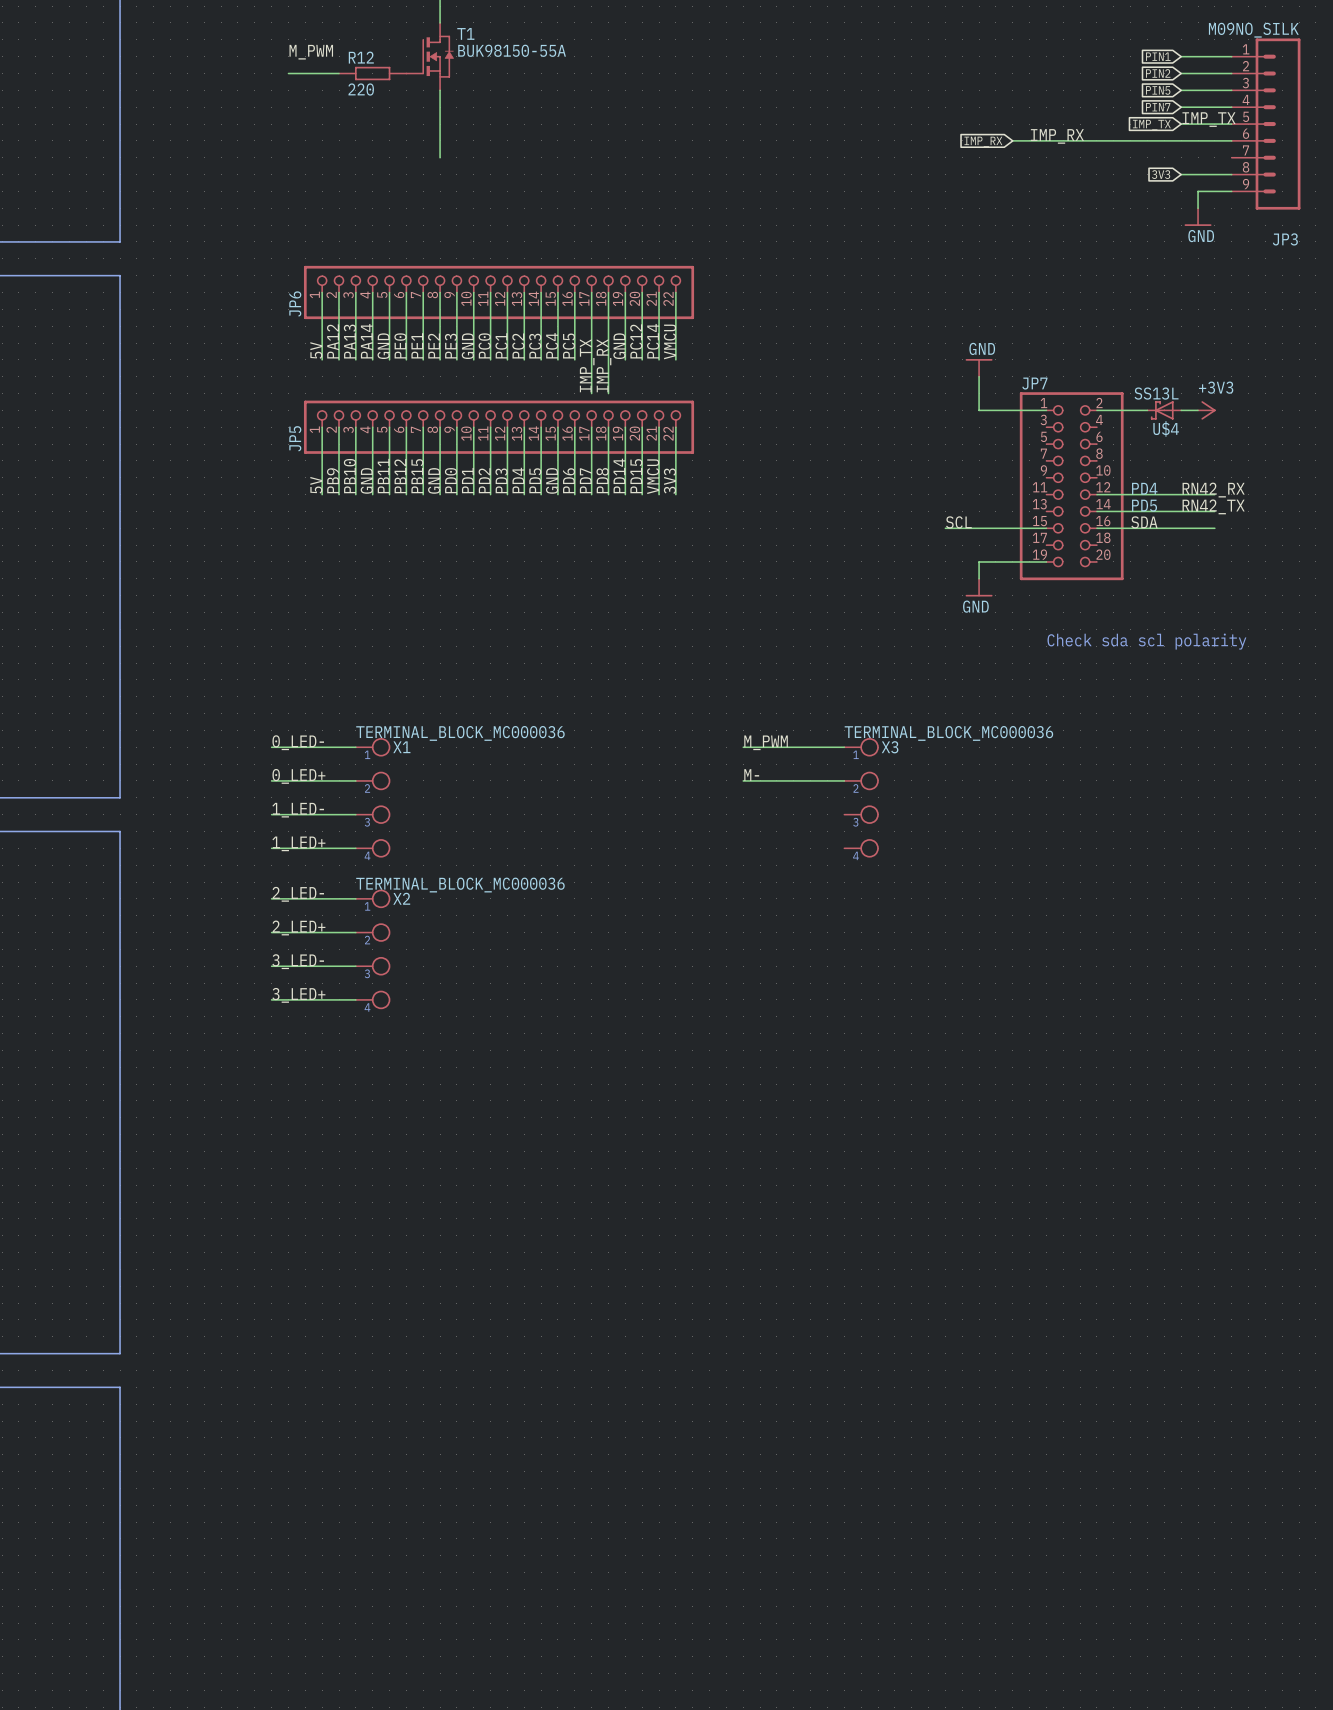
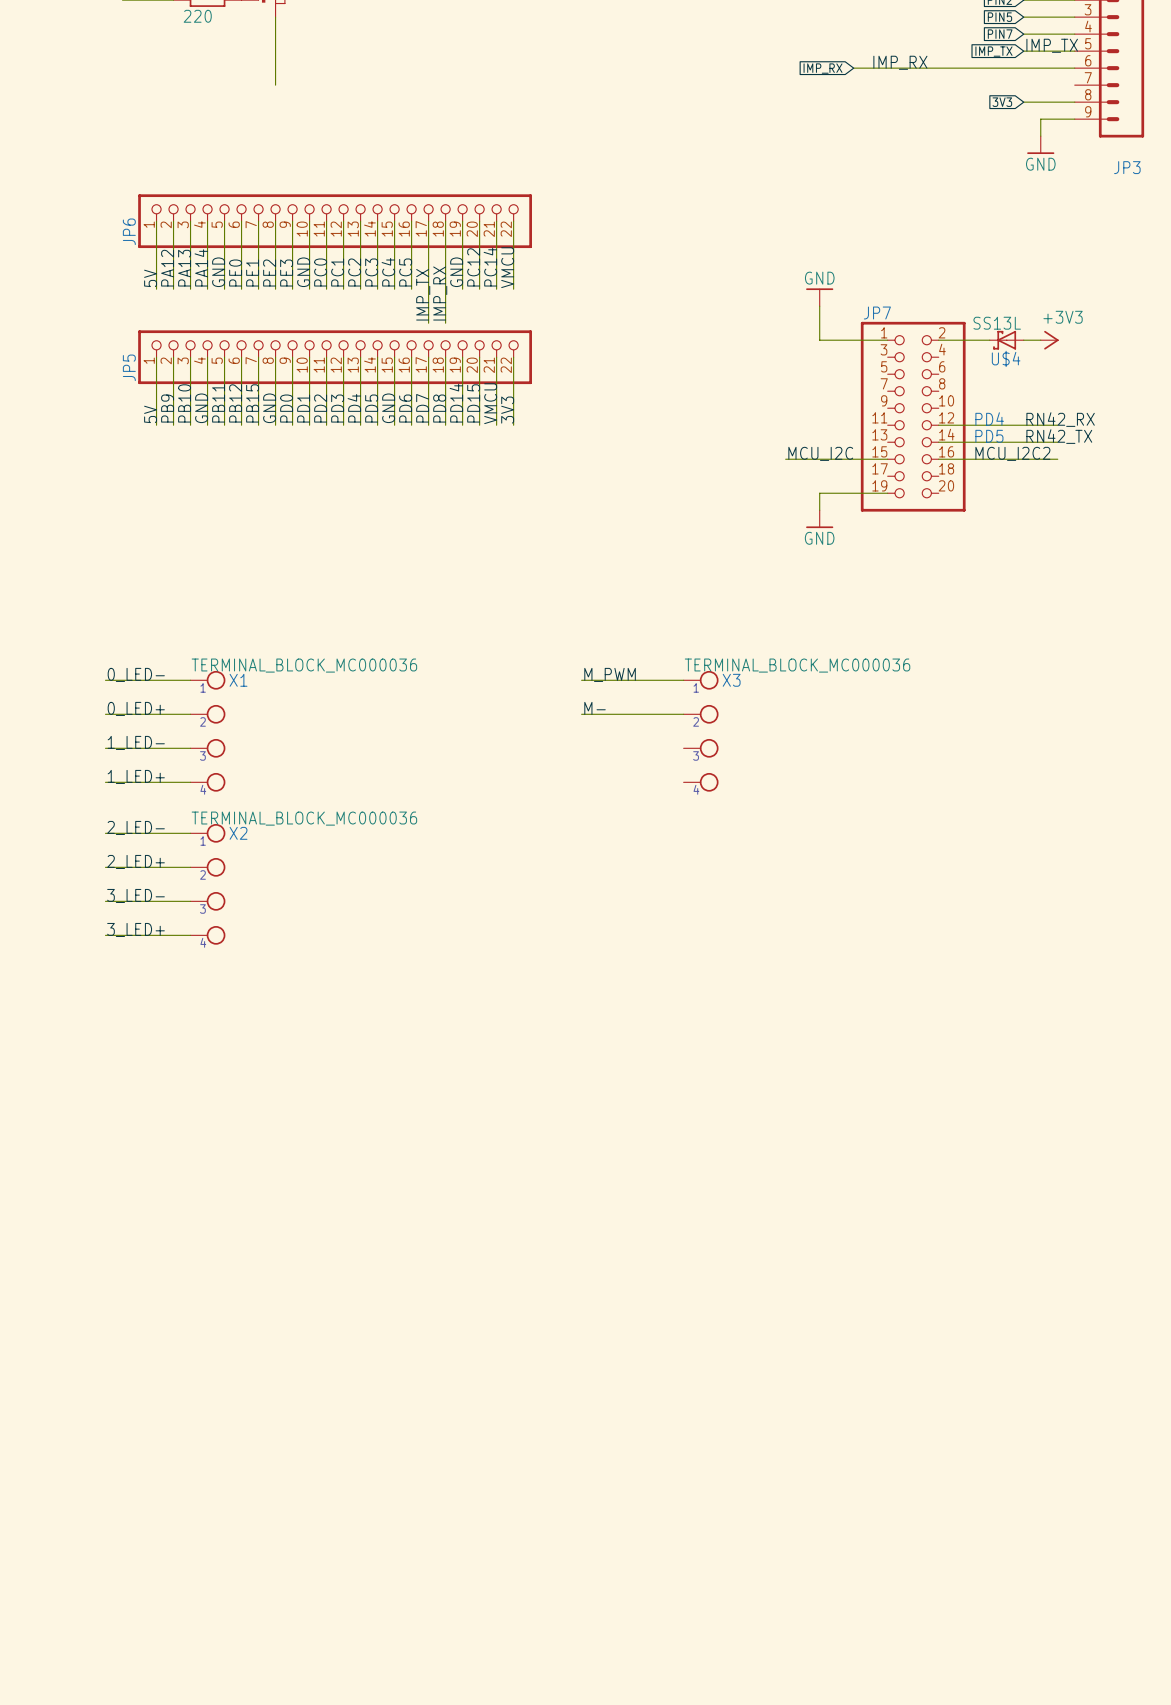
label: SCL (958, 522) -> MCU_I2C (820, 453)
label: SDA (1144, 522) -> MCU_I2C2 (1012, 453)
text: Check sda scl polarity (1146, 641) -> none

